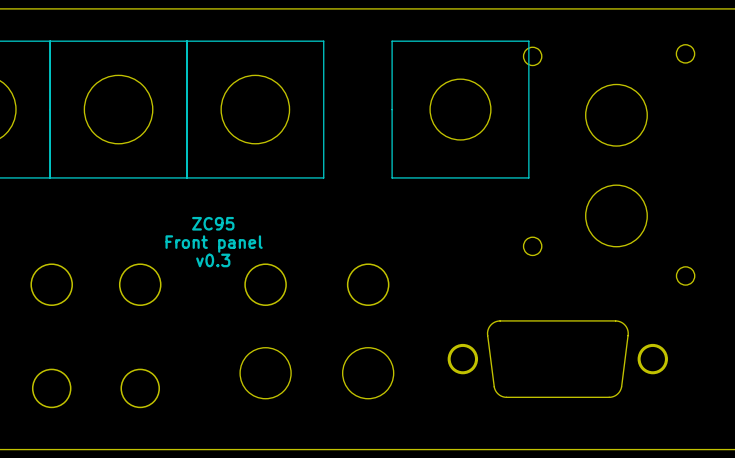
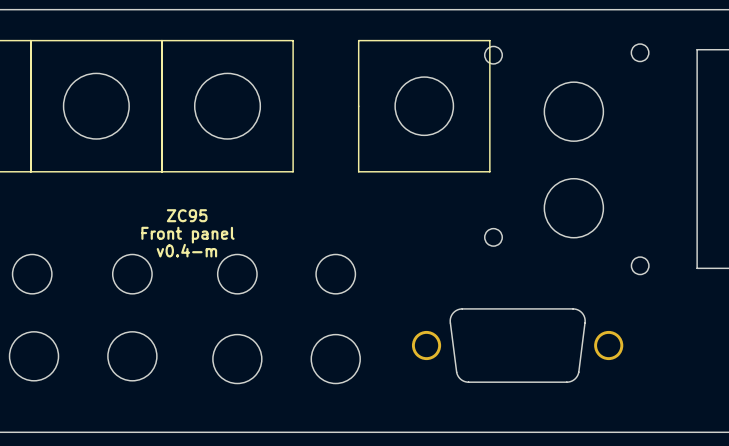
text: v0.3 (213, 260) -> v0.4-m (186, 250)
round board edge: [118, 263, 162, 306] -> none
round board edge: none -> [112, 253, 153, 295]
round board edge: none -> [8, 331, 60, 382]
round board edge: none -> [107, 331, 158, 382]
round board edge: [31, 368, 72, 409] -> none
round board edge: [120, 368, 160, 409] -> none

